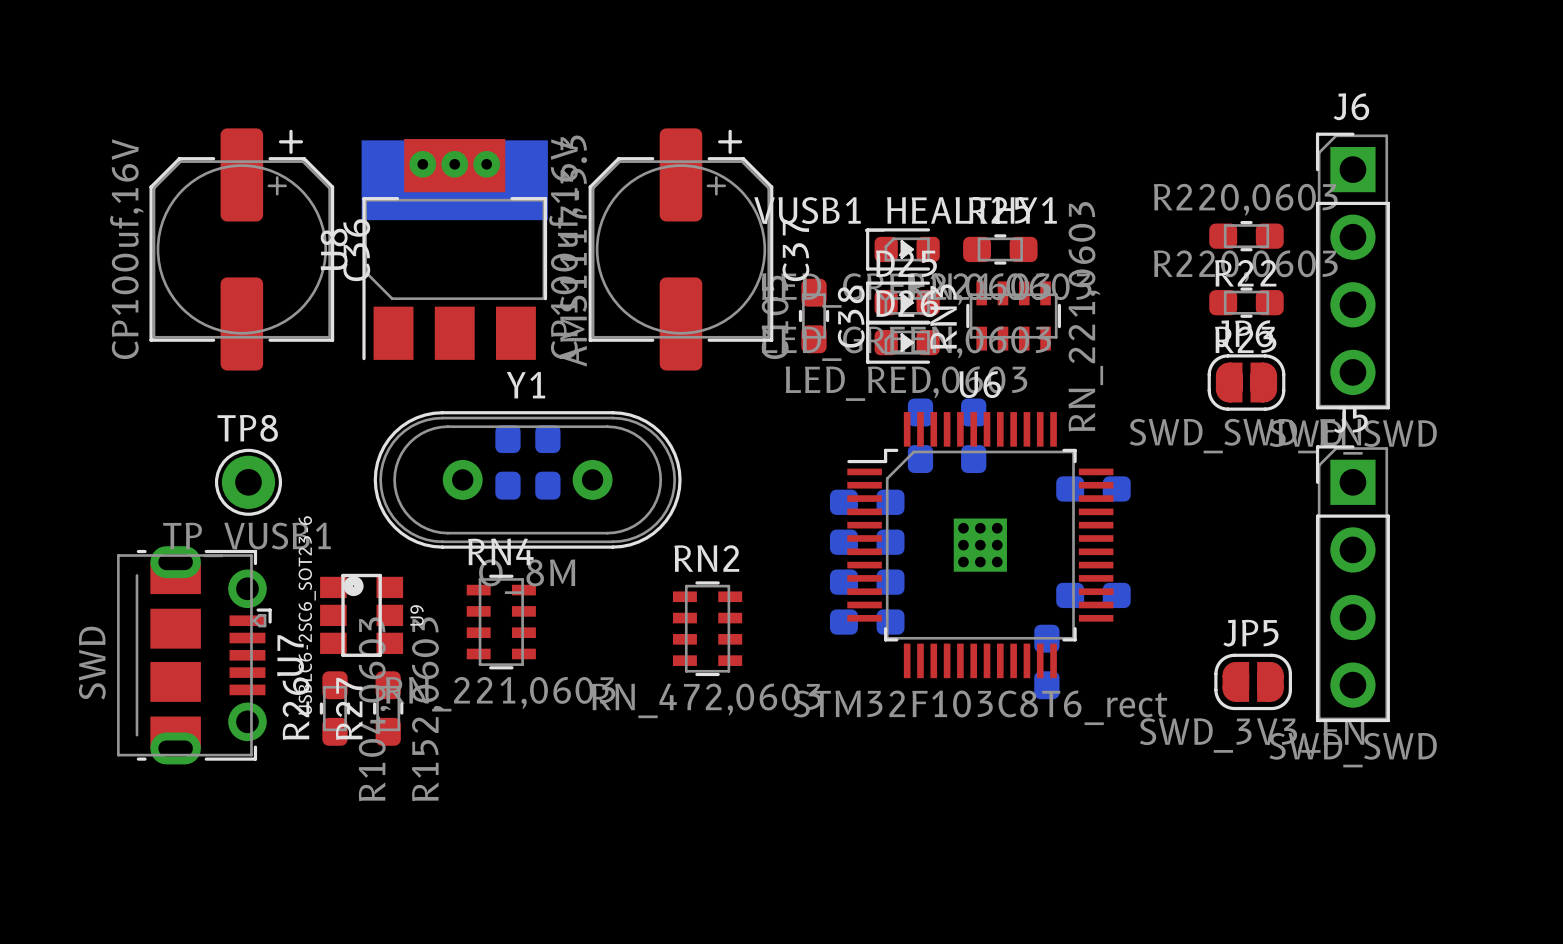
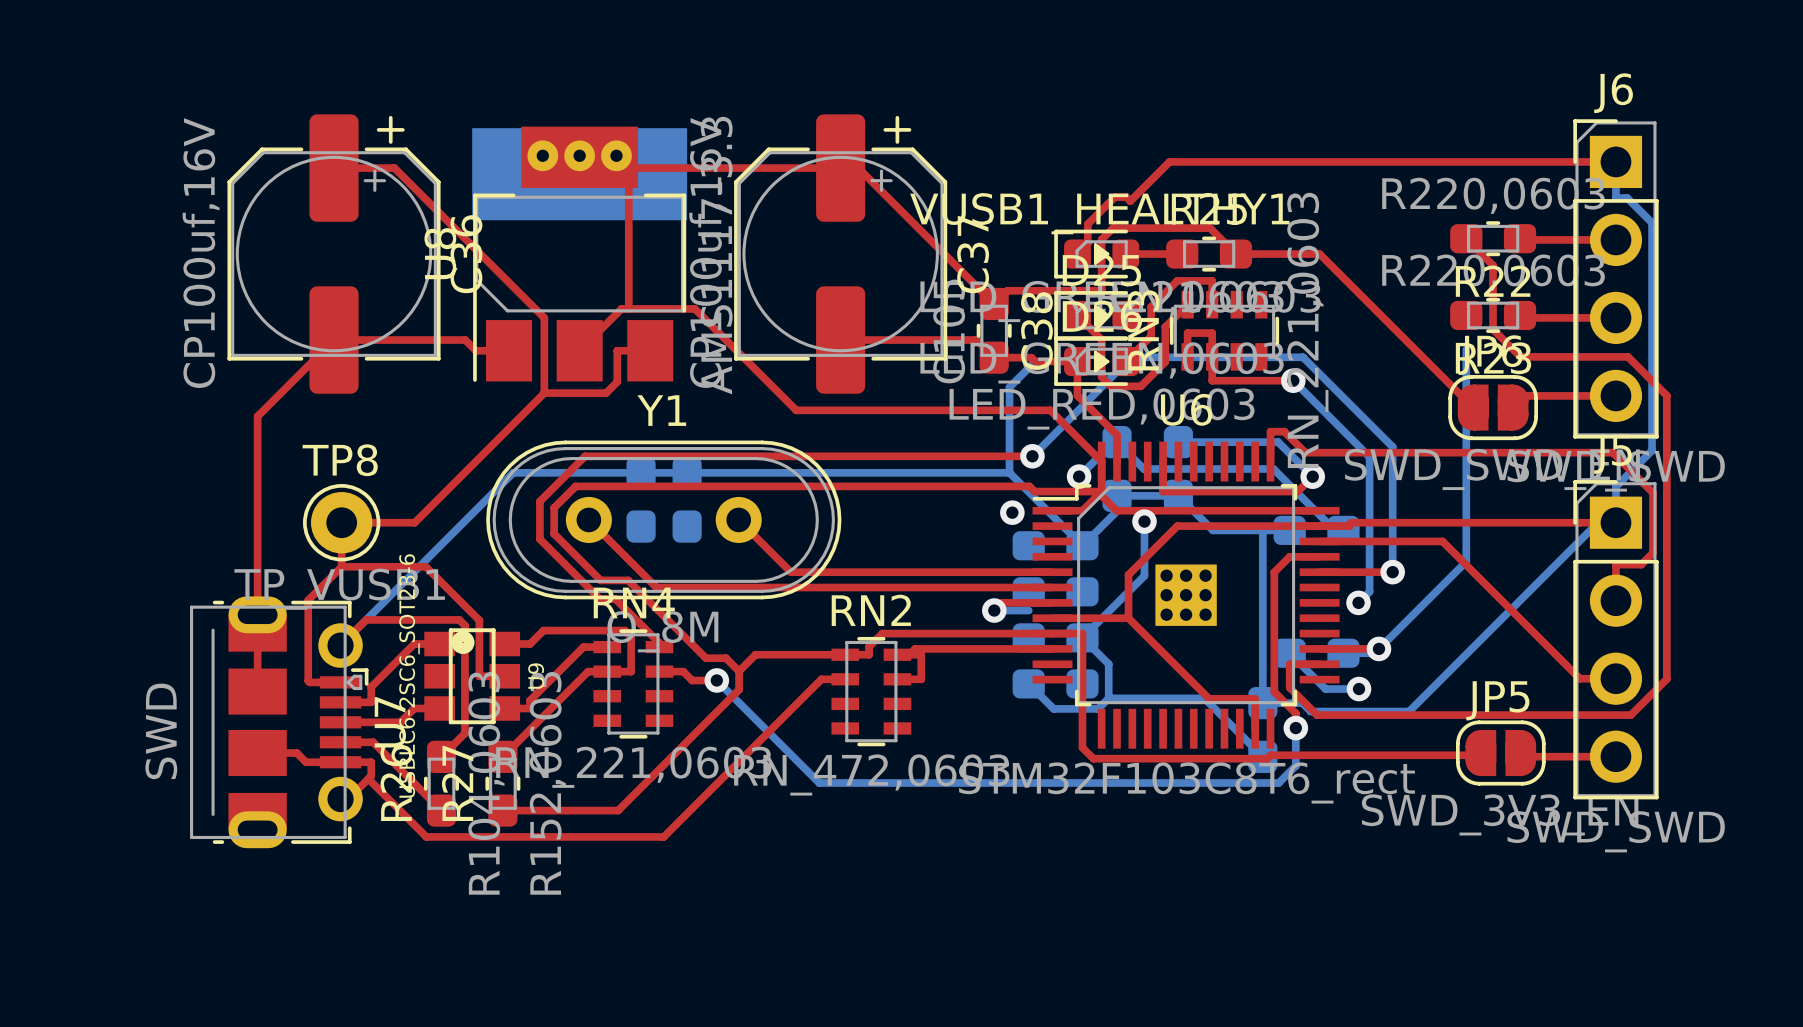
top track: none -> (1615, 161) (1169, 161) (1130, 201) (1126, 197) (1114, 197) (1087, 224) (1087, 243) (1077, 254)
bottom track: none -> (1615, 161) (1615, 198) (1627, 198) (1652, 222) (1652, 450) (1615, 486) (1615, 522)
top track: none -> (334, 168) (394, 168) (544, 317) (544, 393)
top track: none -> (628, 168) (628, 308)
top track: none -> (628, 168) (858, 168) (994, 303) (1007, 290) (1101, 290) (1101, 239) (1113, 228) (1210, 228) (1235, 254) (1319, 254) (1473, 407)
top track: none -> (1466, 238) (1493, 265) (1493, 329) (1520, 356) (1628, 356) (1666, 395) (1666, 679) (1630, 715) (1317, 715) (1289, 687) (1289, 664) (1319, 664)
top track: none -> (1520, 238) (1615, 239)
top track: none -> (1125, 254) (1182, 254)
top track: none -> (1187, 304) (1165, 327) (1165, 361) (1140, 386) (1110, 386) (1101, 377) (1101, 339) (1077, 315)
top track: none -> (1212, 304) (1212, 280) (1177, 280) (1151, 306) (1151, 336) (1125, 361)
top track: none -> (1520, 315) (1522, 317) (1615, 317)
top track: none -> (840, 340) (976, 340) (994, 357) (1031, 357) (1035, 361) (1077, 361) (1077, 395) (1117, 435) (1117, 461)
bottom track: none -> (1466, 349) (1466, 561) (1374, 653) (1343, 653)
top track: none -> (509, 350) (476, 350) (465, 340) (334, 340) (257, 416) (257, 691)
top track: none -> (579, 350) (621, 308) (694, 308) (796, 410) (1050, 410) (1101, 461) (1101, 495)
top track: none -> (650, 350) (617, 350) (617, 381) (606, 393) (544, 393)
top track: none -> (1187, 356) (1187, 333) (1212, 333) (1212, 380) (1293, 380)
bottom track: none -> (1035, 361) (1009, 387) (1009, 472)
bottom track: none -> (1293, 380) (1369, 457) (1369, 591) (1358, 602)
via: none -> (1293, 380)
top track: none -> (544, 393) (414, 522) (341, 522) (341, 566)
top track: none -> (1615, 395) (1524, 395) (1513, 407)
bottom track: none -> (1178, 442) (1278, 442) (1312, 476)
top track: none -> (1032, 456) (585, 456) (539, 501) (539, 539) (599, 599) (615, 599) (659, 643) (659, 647)
bottom track: none -> (1032, 456) (1131, 357) (1303, 357) (1392, 446) (1392, 572)
via: none -> (1032, 456)
top track: none -> (1163, 461) (1163, 491) (1297, 491) (1312, 476)
top track: none -> (1270, 461) (1270, 431) (1284, 431) (1305, 452) (1612, 452) (1653, 492) (1653, 552) (1641, 564) (1615, 564) (1615, 600)
bottom track: none -> (1009, 472) (513, 472) (340, 645)
bottom track: none -> (1009, 472) (1082, 545) (1117, 511) (1117, 495) (1178, 495) (1212, 530) (1289, 530)
bottom track: none -> (1079, 476) (1113, 442) (1117, 442) (1143, 468) (1273, 468) (1334, 530) (1343, 530)
via: none -> (1079, 476)
via: none -> (1312, 476)
top track: none -> (1101, 491) (1034, 491) (1029, 486) (575, 486) (554, 507) (554, 533) (600, 580) (628, 580) (705, 658) (726, 658) (739, 671)
top track: none -> (1101, 495) (1097, 495) (1082, 510) (1052, 510)
top track: none -> (1101, 495) (1116, 510) (1319, 510)
bottom track: none -> (1615, 504) (1409, 711) (1310, 711) (1302, 703) (1262, 703) (1262, 530)
via: none -> (1012, 512)
top track: none -> (588, 519) (656, 587) (1052, 587)
top track: none -> (738, 519) (790, 572) (1052, 572)
bottom track: none -> (1144, 521) (1144, 575) (1082, 637) (1108, 664) (1108, 698)
via: none -> (1144, 521)
top track: none -> (1615, 522) (1351, 522) (1349, 526) (1177, 526) (1128, 574) (1128, 618)
top track: none -> (1319, 541) (1442, 541) (1579, 678) (1615, 678)
top track: none -> (1319, 556) (1289, 556) (1274, 572) (1274, 691) (1295, 713) (1295, 728)
top track: none -> (341, 566) (425, 566) (479, 620) (479, 676) (504, 676)
top track: none -> (341, 566) (308, 600) (308, 680) (309, 682) (340, 682)
top track: none -> (1319, 572) (1392, 572)
via: none -> (1392, 572)
top track: none -> (1052, 602) (1001, 602) (994, 610)
via: none -> (1358, 602)
bottom track: none -> (994, 610) (1028, 610)
via: none -> (994, 610)
top track: none -> (1052, 618) (1128, 618)
top track: none -> (1128, 618) (1209, 698) (1255, 698) (1255, 728)
top track: none -> (439, 644) (414, 644) (371, 687) (371, 702) (340, 702)
top track: none -> (504, 644) (530, 644) (543, 630) (625, 630) (631, 636) (631, 671) (588, 671) (502, 756)
top track: none -> (340, 645) (366, 619) (459, 619) (464, 625) (464, 733) (441, 756)
top track: none -> (607, 647) (583, 647) (530, 700) (530, 708) (504, 708)
top track: none -> (1052, 648) (915, 648) (909, 654)
top track: none -> (1319, 648) (1378, 648)
via: none -> (1378, 648)
bottom track: none -> (1289, 653) (1325, 689) (1359, 689)
top track: none -> (897, 654) (921, 654) (921, 679) (897, 679)
top track: none -> (659, 671) (683, 671) (692, 680) (716, 680)
top track: none -> (739, 671) (739, 689) (618, 810) (502, 810)
top track: none -> (739, 671) (755, 654) (869, 654) (869, 646) (882, 633) (1082, 633) (1082, 747) (1093, 758) (1267, 758) (1270, 755) (1478, 755) (1480, 753)
top track: none -> (845, 679) (821, 679) (663, 836) (426, 836) (368, 778)
bottom track: none -> (716, 680) (819, 782) (1278, 782) (1295, 765) (1295, 728)
via: none -> (716, 680)
bottom track: none -> (1028, 683) (1053, 708) (1098, 708) (1108, 698)
via: none -> (1359, 689)
bottom track: none -> (1108, 698) (1204, 698) (1262, 756)
top track: none -> (439, 708) (414, 708) (400, 722) (340, 722)
via: none -> (1295, 728)
top track: none -> (340, 742) (373, 742) (441, 810)
top track: none -> (257, 753) (296, 753) (306, 762) (371, 762) (371, 776) (348, 799) (340, 799)
top track: none -> (1520, 753) (1524, 756) (1615, 756)

